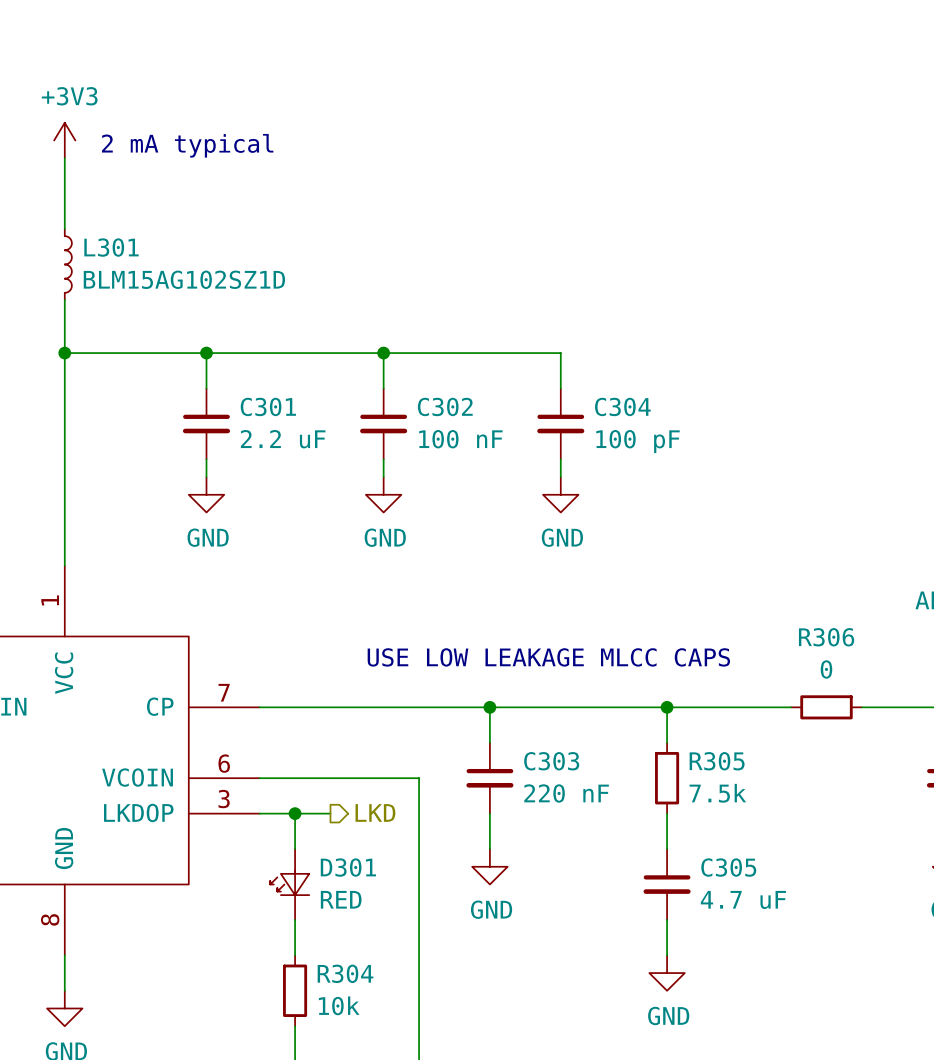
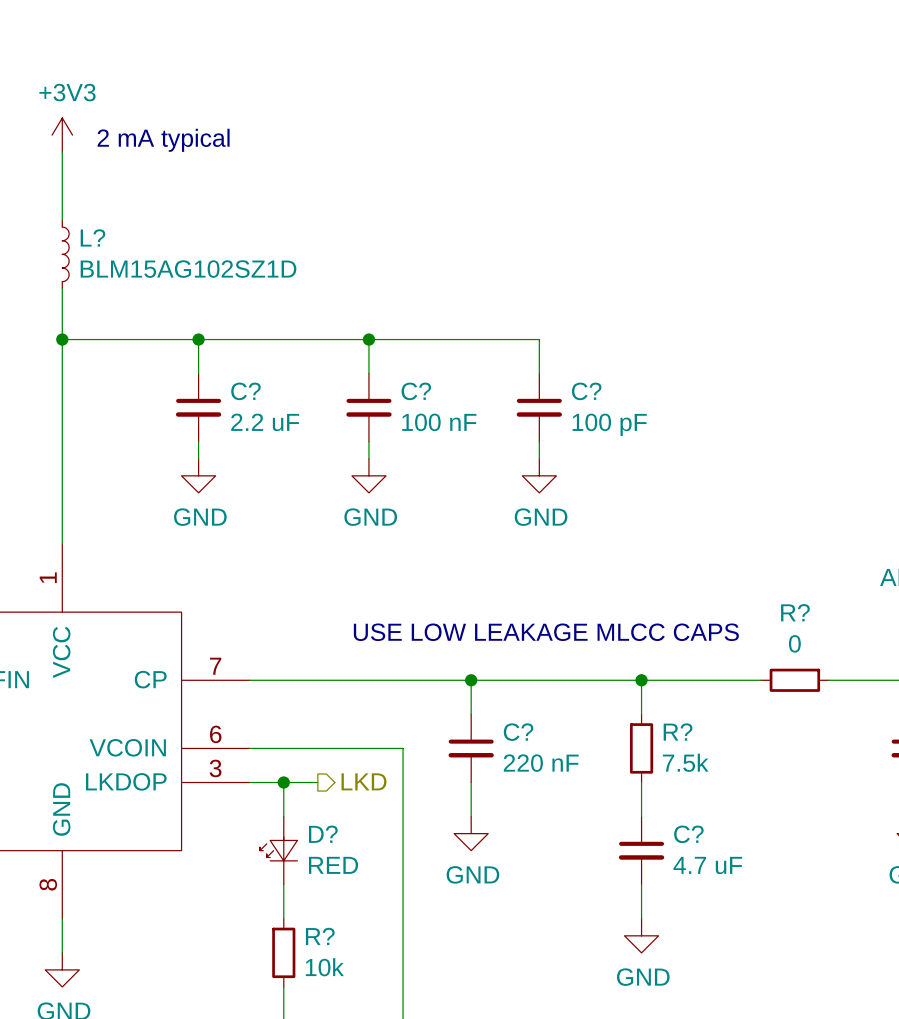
L301 name: L301 (111, 247) -> L? (92, 237)
C301 name: C301 (268, 406) -> C? (245, 391)
C302 name: C302 (445, 406) -> C? (416, 391)
C304 name: C304 (622, 406) -> C? (586, 391)
R306 name: R306 (826, 637) -> R? (795, 612)
C303 name: C303 (551, 761) -> C? (518, 732)
R305 name: R305 (717, 761) -> R? (678, 732)
D301 name: D301 (348, 867) -> D? (323, 834)
C305 name: C305 (728, 867) -> C? (688, 834)
R304 name: R304 (345, 973) -> R? (320, 936)

